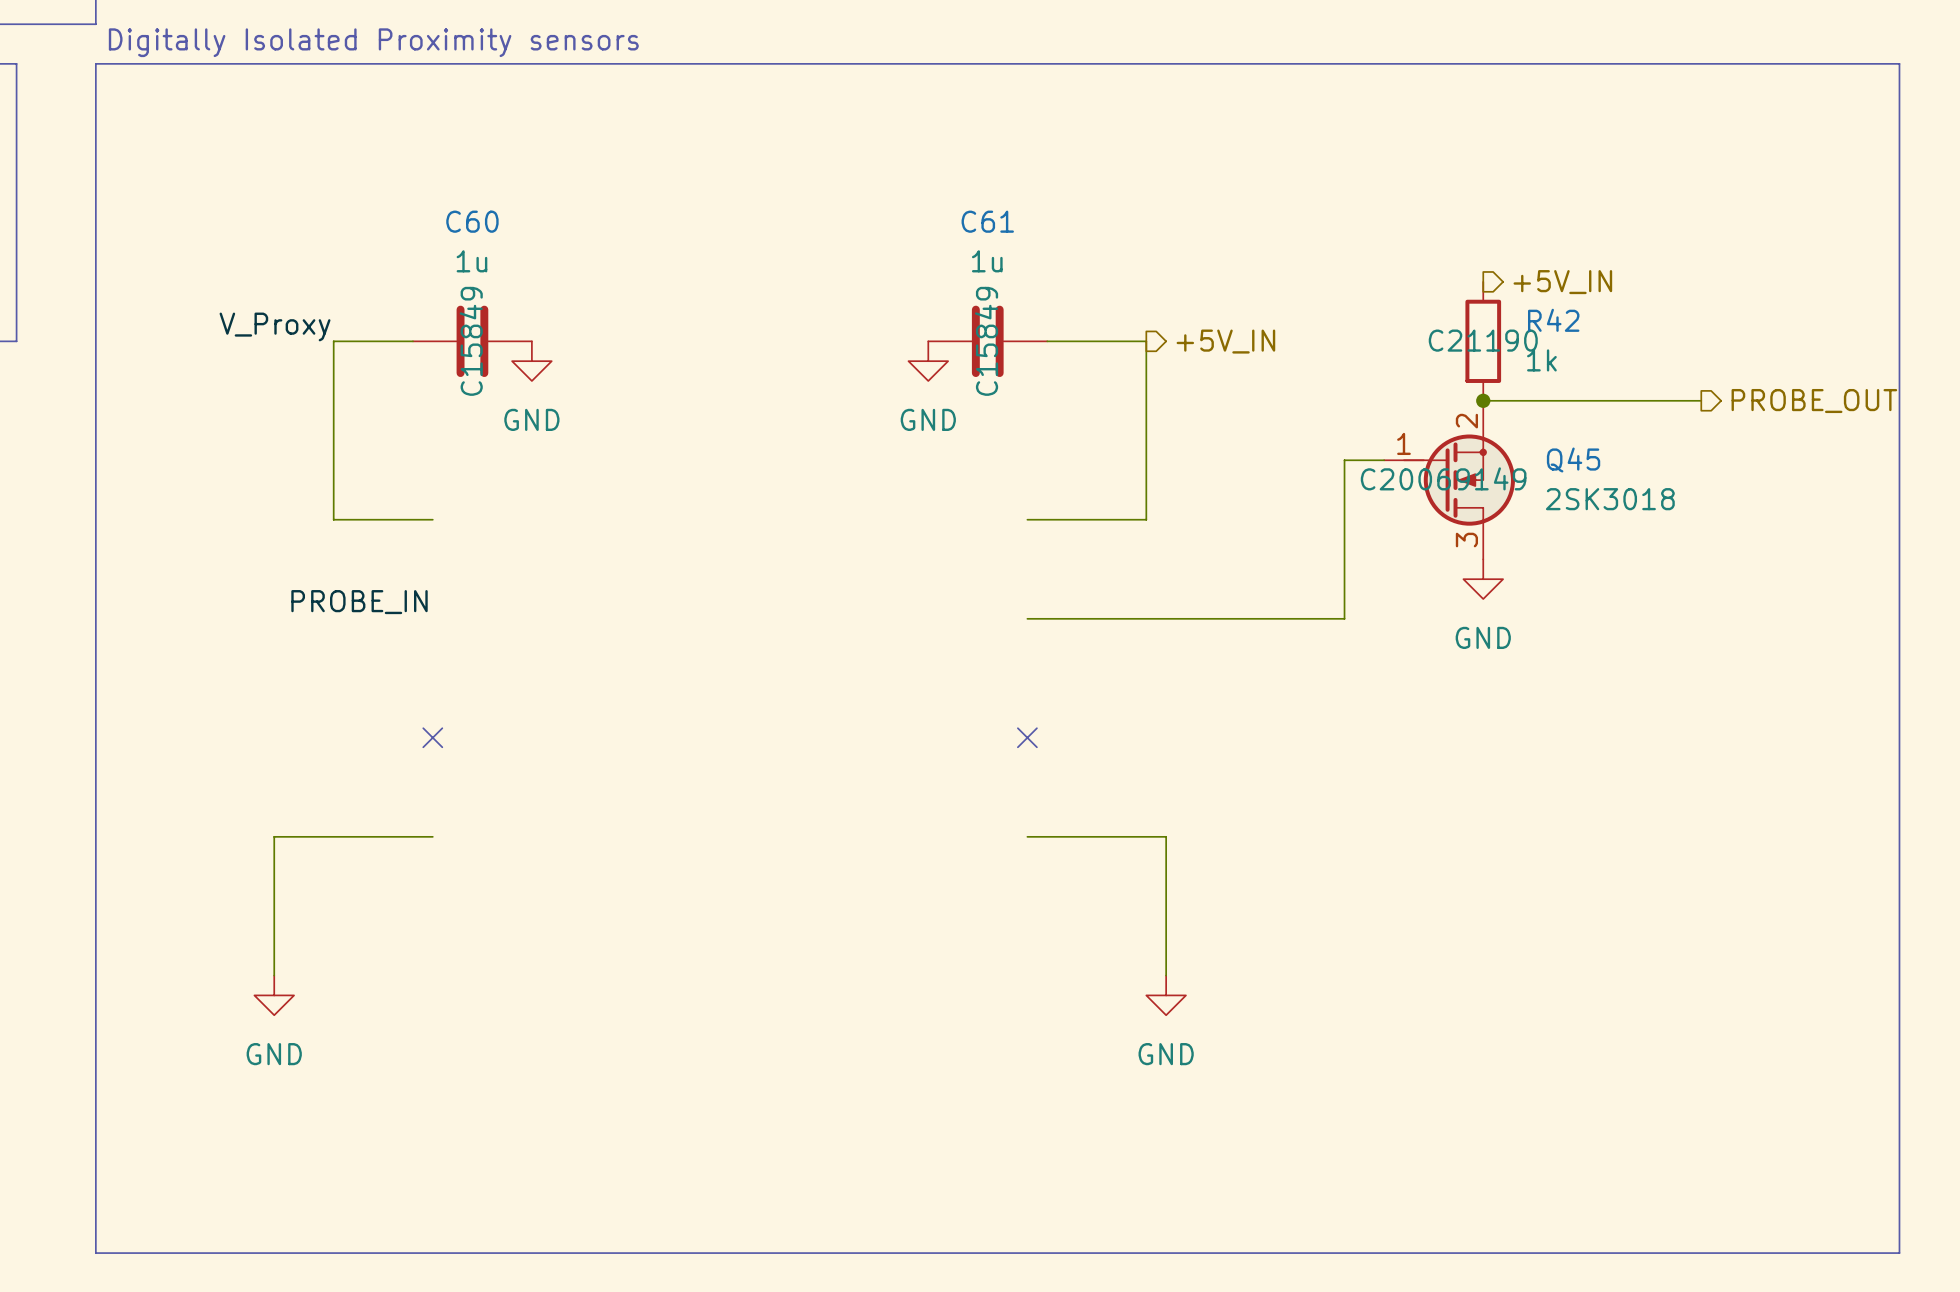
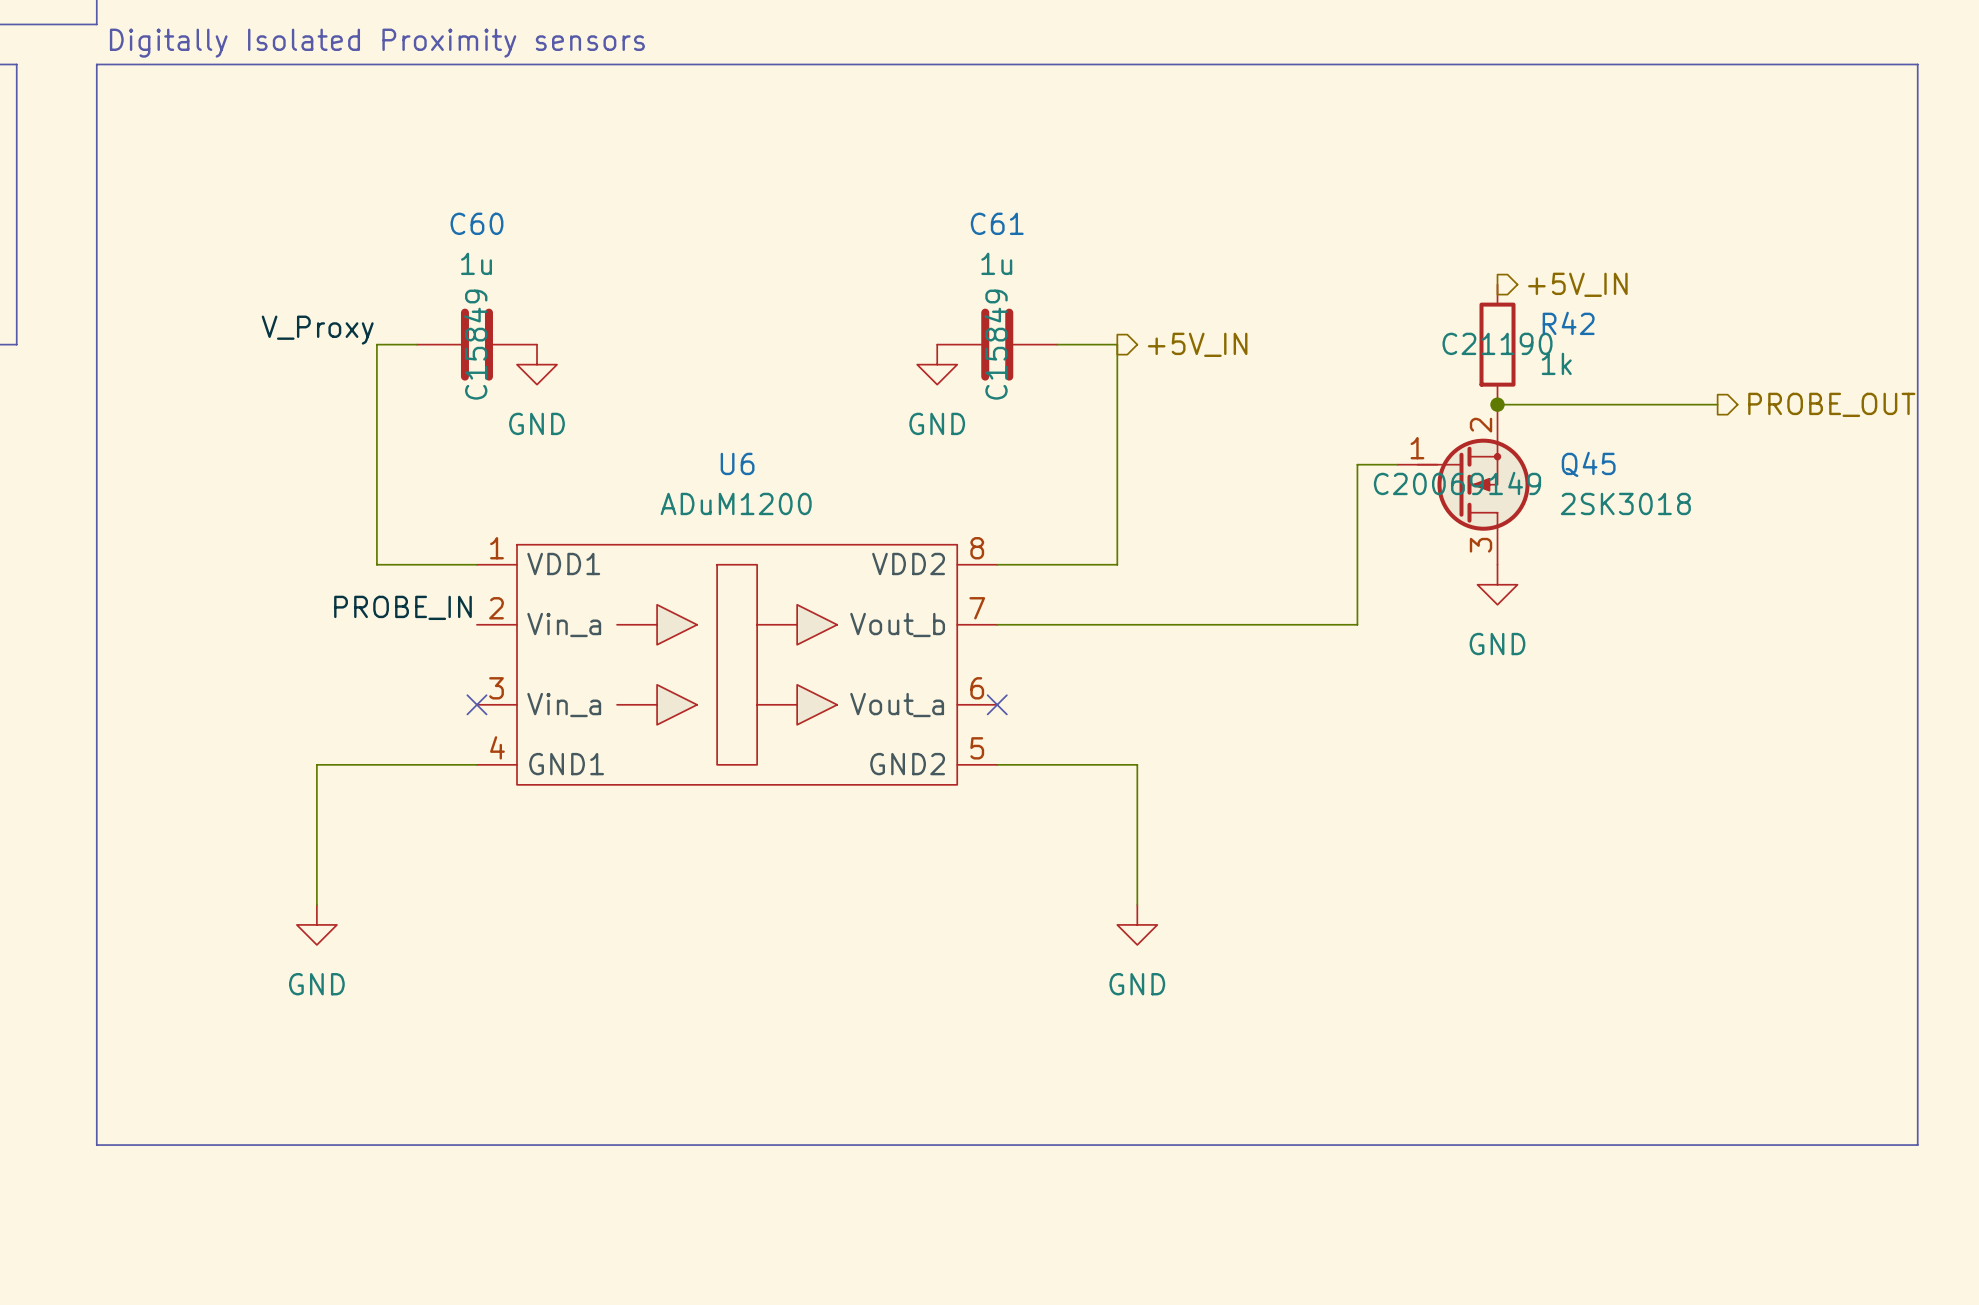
label position: V_Proxy (275, 326) -> V_Proxy (317, 330)
wire: (373, 341) (333, 341) (333, 519) (432, 519) -> (376, 344) (376, 564) (476, 564)
wire: (1106, 341) (1146, 341) (1146, 519) (1027, 519) -> (1117, 344) (1117, 564) (997, 564)
hierarchical label position: +5V_IN (1225, 341) -> +5V_IN (1197, 344)
label position: PROBE_IN (359, 602) -> PROBE_IN (402, 607)
wire: none -> (997, 624) (1037, 624)
U6: none -> ADuM1200 (737, 664)
no-connect mark position: (432, 737) -> (476, 704)
no-connect mark position: (1027, 737) -> (997, 704)
wire: (432, 836) (274, 836) (274, 975) -> (476, 764) (316, 764) (316, 904)
wire: (1027, 836) (1166, 836) (1166, 975) -> (997, 764) (1137, 764) (1137, 904)
power symbol position: GND (274, 995) -> GND (316, 924)
power symbol position: GND (1166, 995) -> GND (1137, 924)
line: (95, 1134) (95, 1253) (1899, 1253) (1899, 1134) -> (96, 1145) (1917, 1145)

